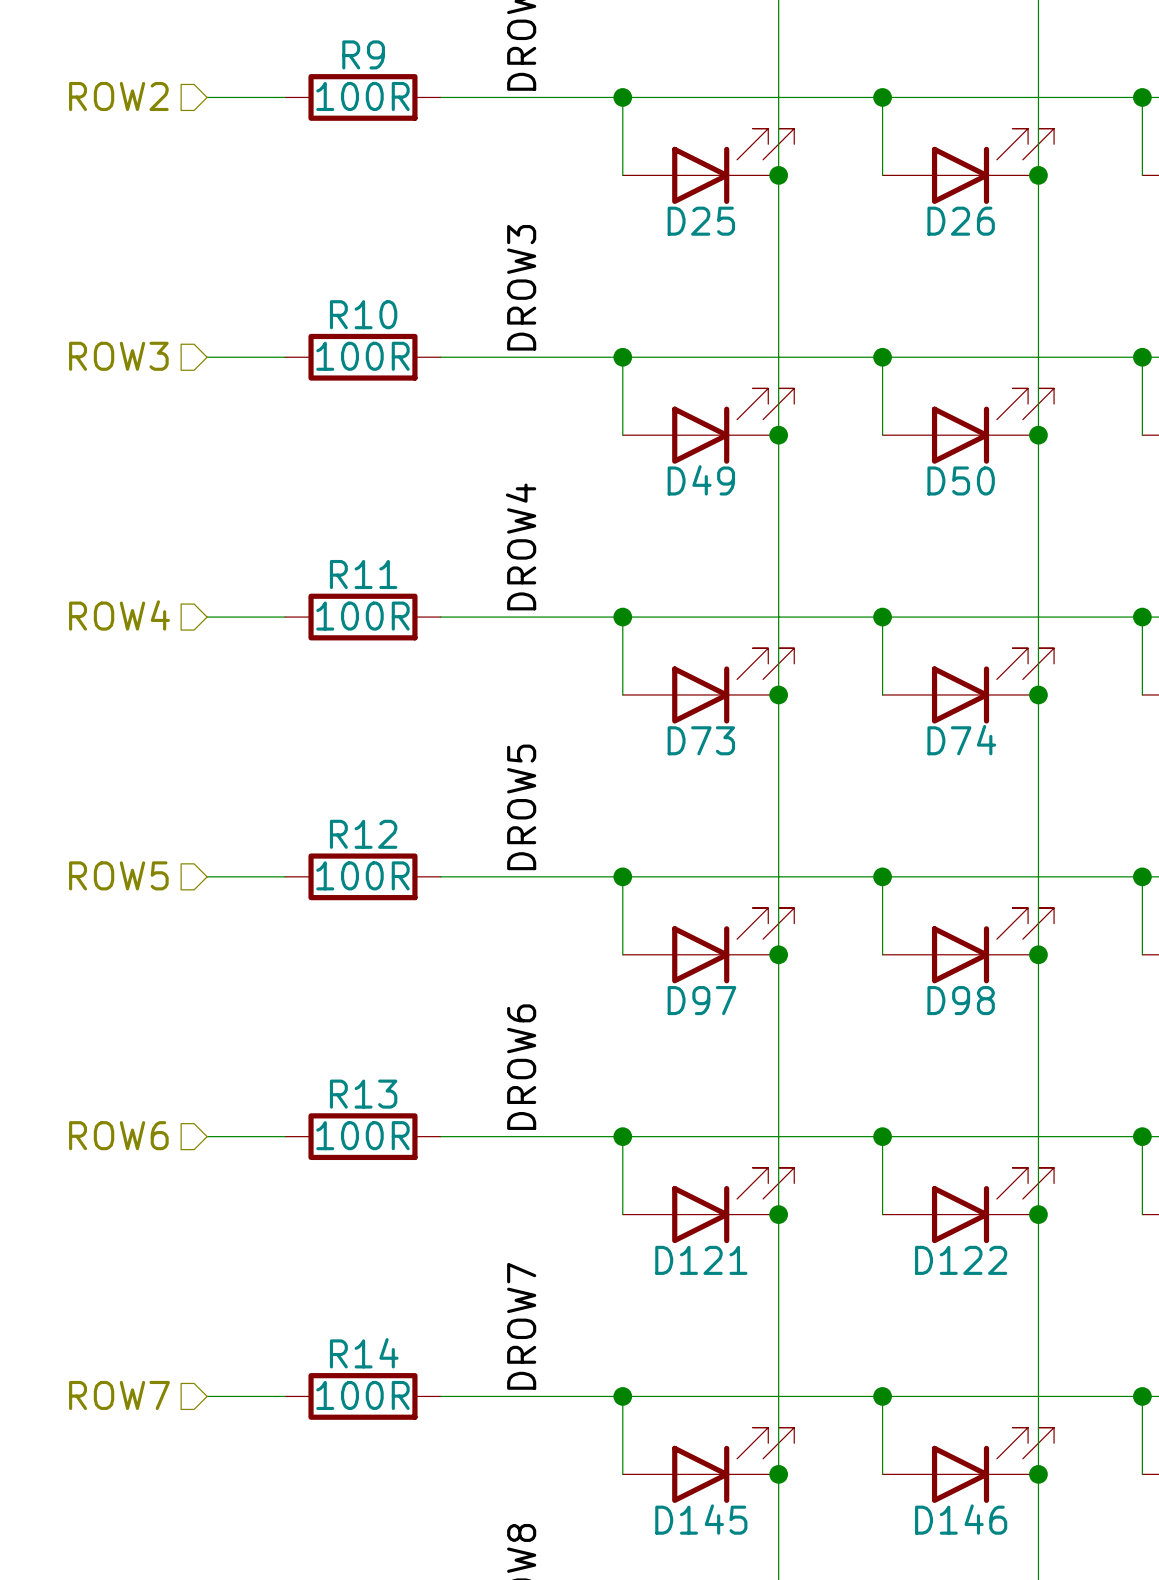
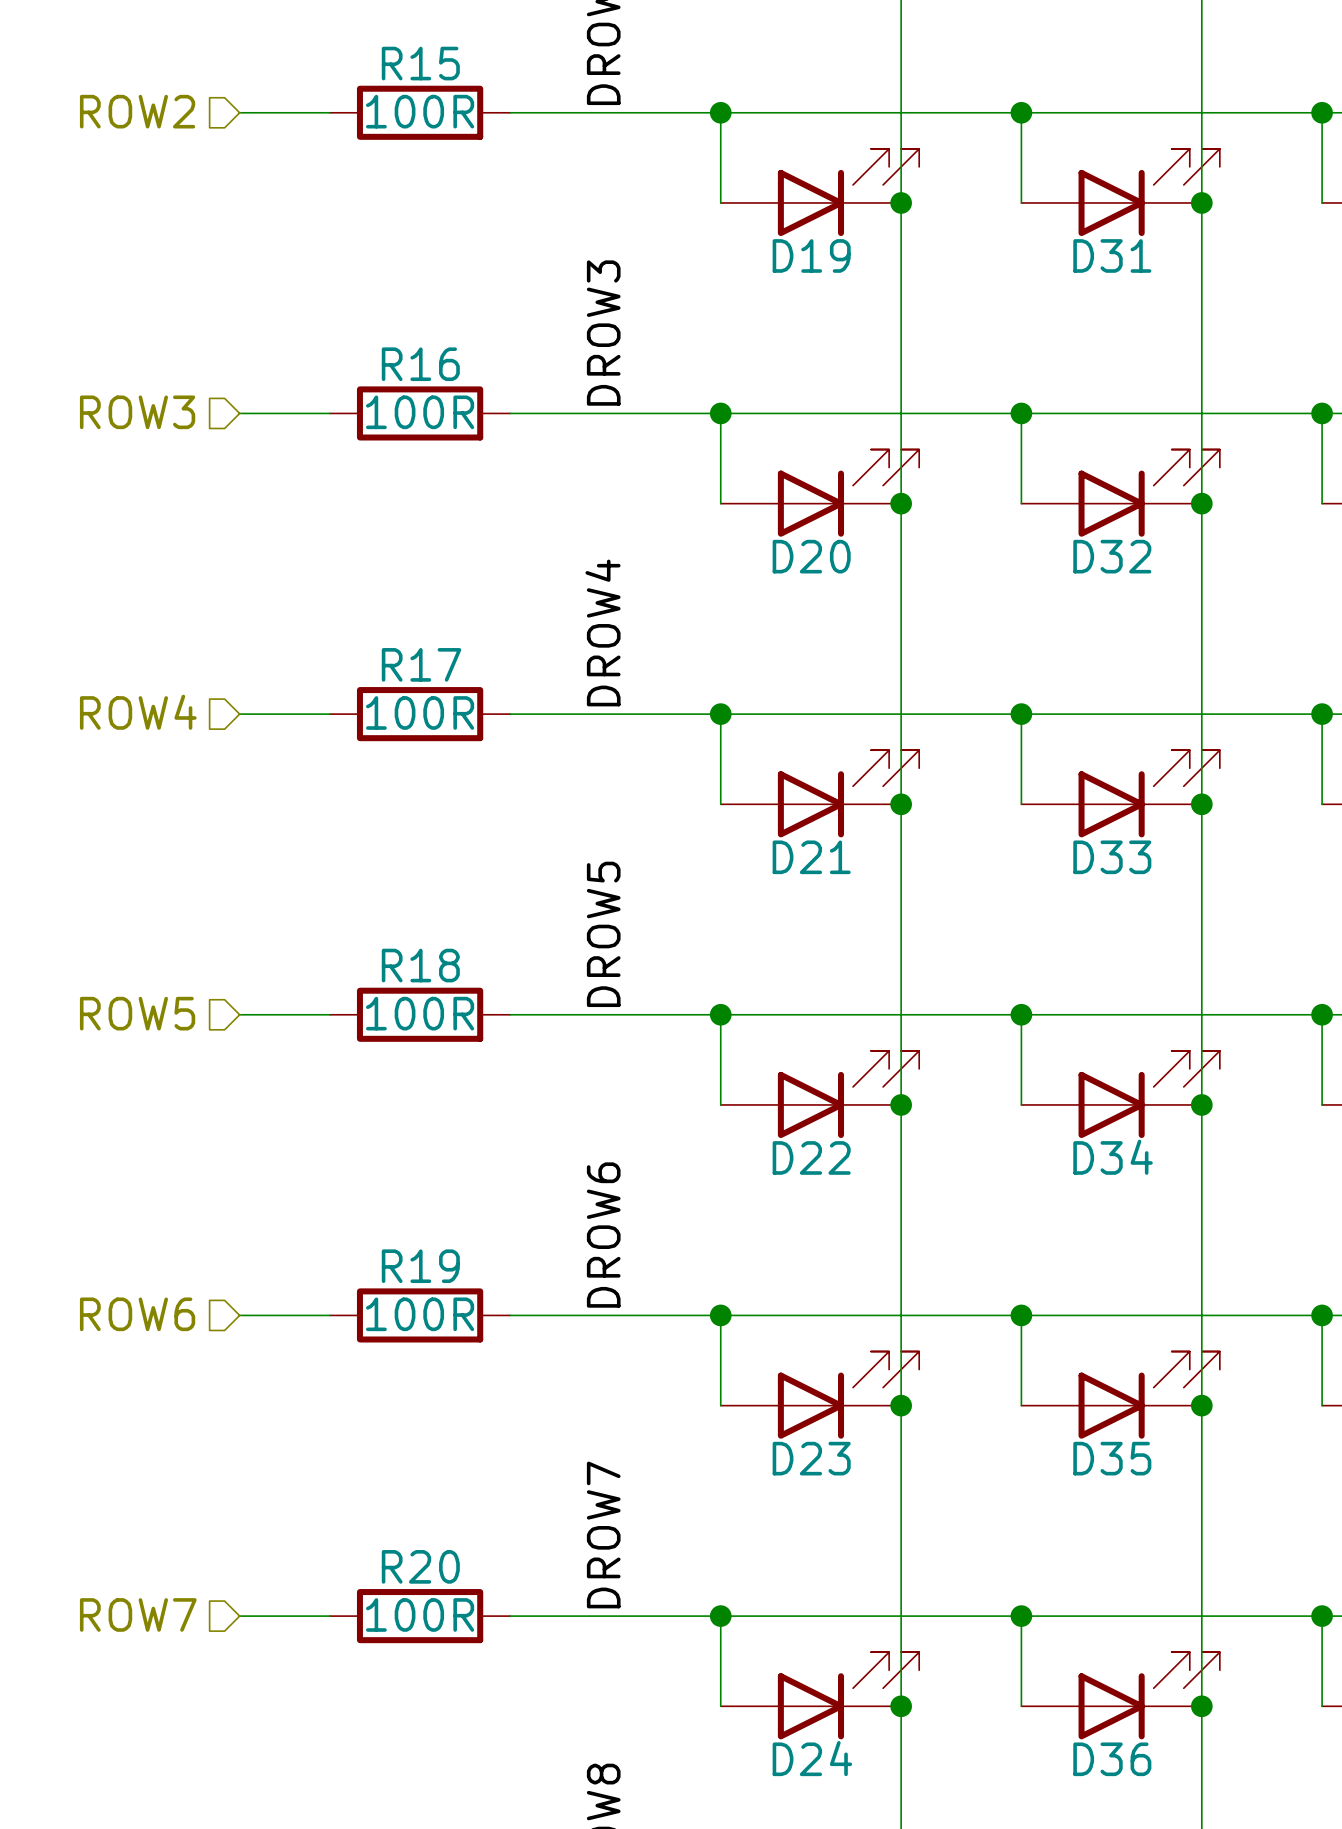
R9 name: R9 (363, 54) -> R15 (420, 63)
D25 name: D25 (701, 221) -> D19 (811, 255)
D26 name: D26 (961, 221) -> D31 (1112, 255)
R10 name: R10 (363, 314) -> R16 (420, 364)
D49 name: D49 (701, 480) -> D20 (811, 556)
D50 name: D50 (961, 480) -> D32 (1112, 556)
R11 name: R11 (363, 574) -> R17 (421, 664)
D73 name: D73 (701, 740) -> D21 (811, 857)
D74 name: D74 (961, 740) -> D33 (1112, 857)
R12 name: R12 (363, 834) -> R18 (420, 965)
D97 name: D97 (701, 1000) -> D22 (811, 1157)
D98 name: D98 (961, 1000) -> D34 (1113, 1157)
R13 name: R13 (363, 1094) -> R19 (420, 1266)
D121 name: D121 (701, 1260) -> D23 (811, 1458)
D122 name: D122 (961, 1260) -> D35 (1112, 1458)
R14 name: R14 (364, 1353) -> R20 (420, 1566)
D145 name: D145 (701, 1519) -> D24 (812, 1758)
D146 name: D146 (961, 1519) -> D36 (1112, 1759)

